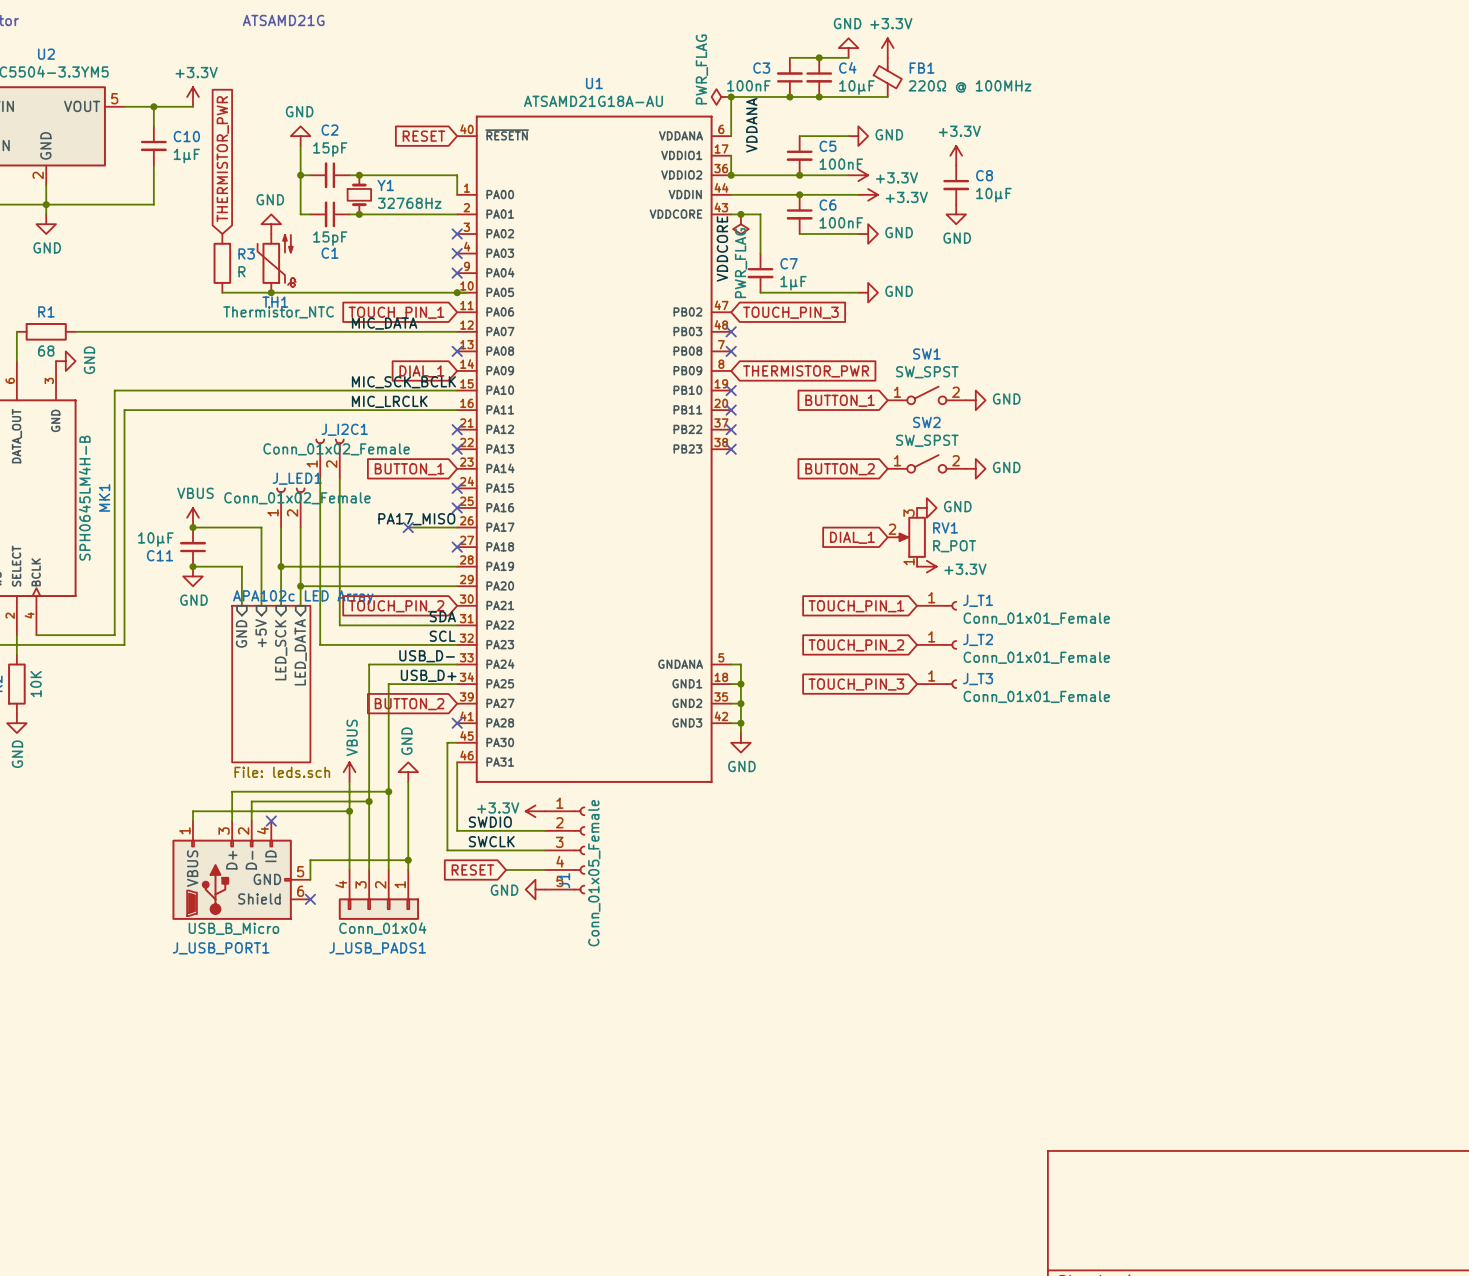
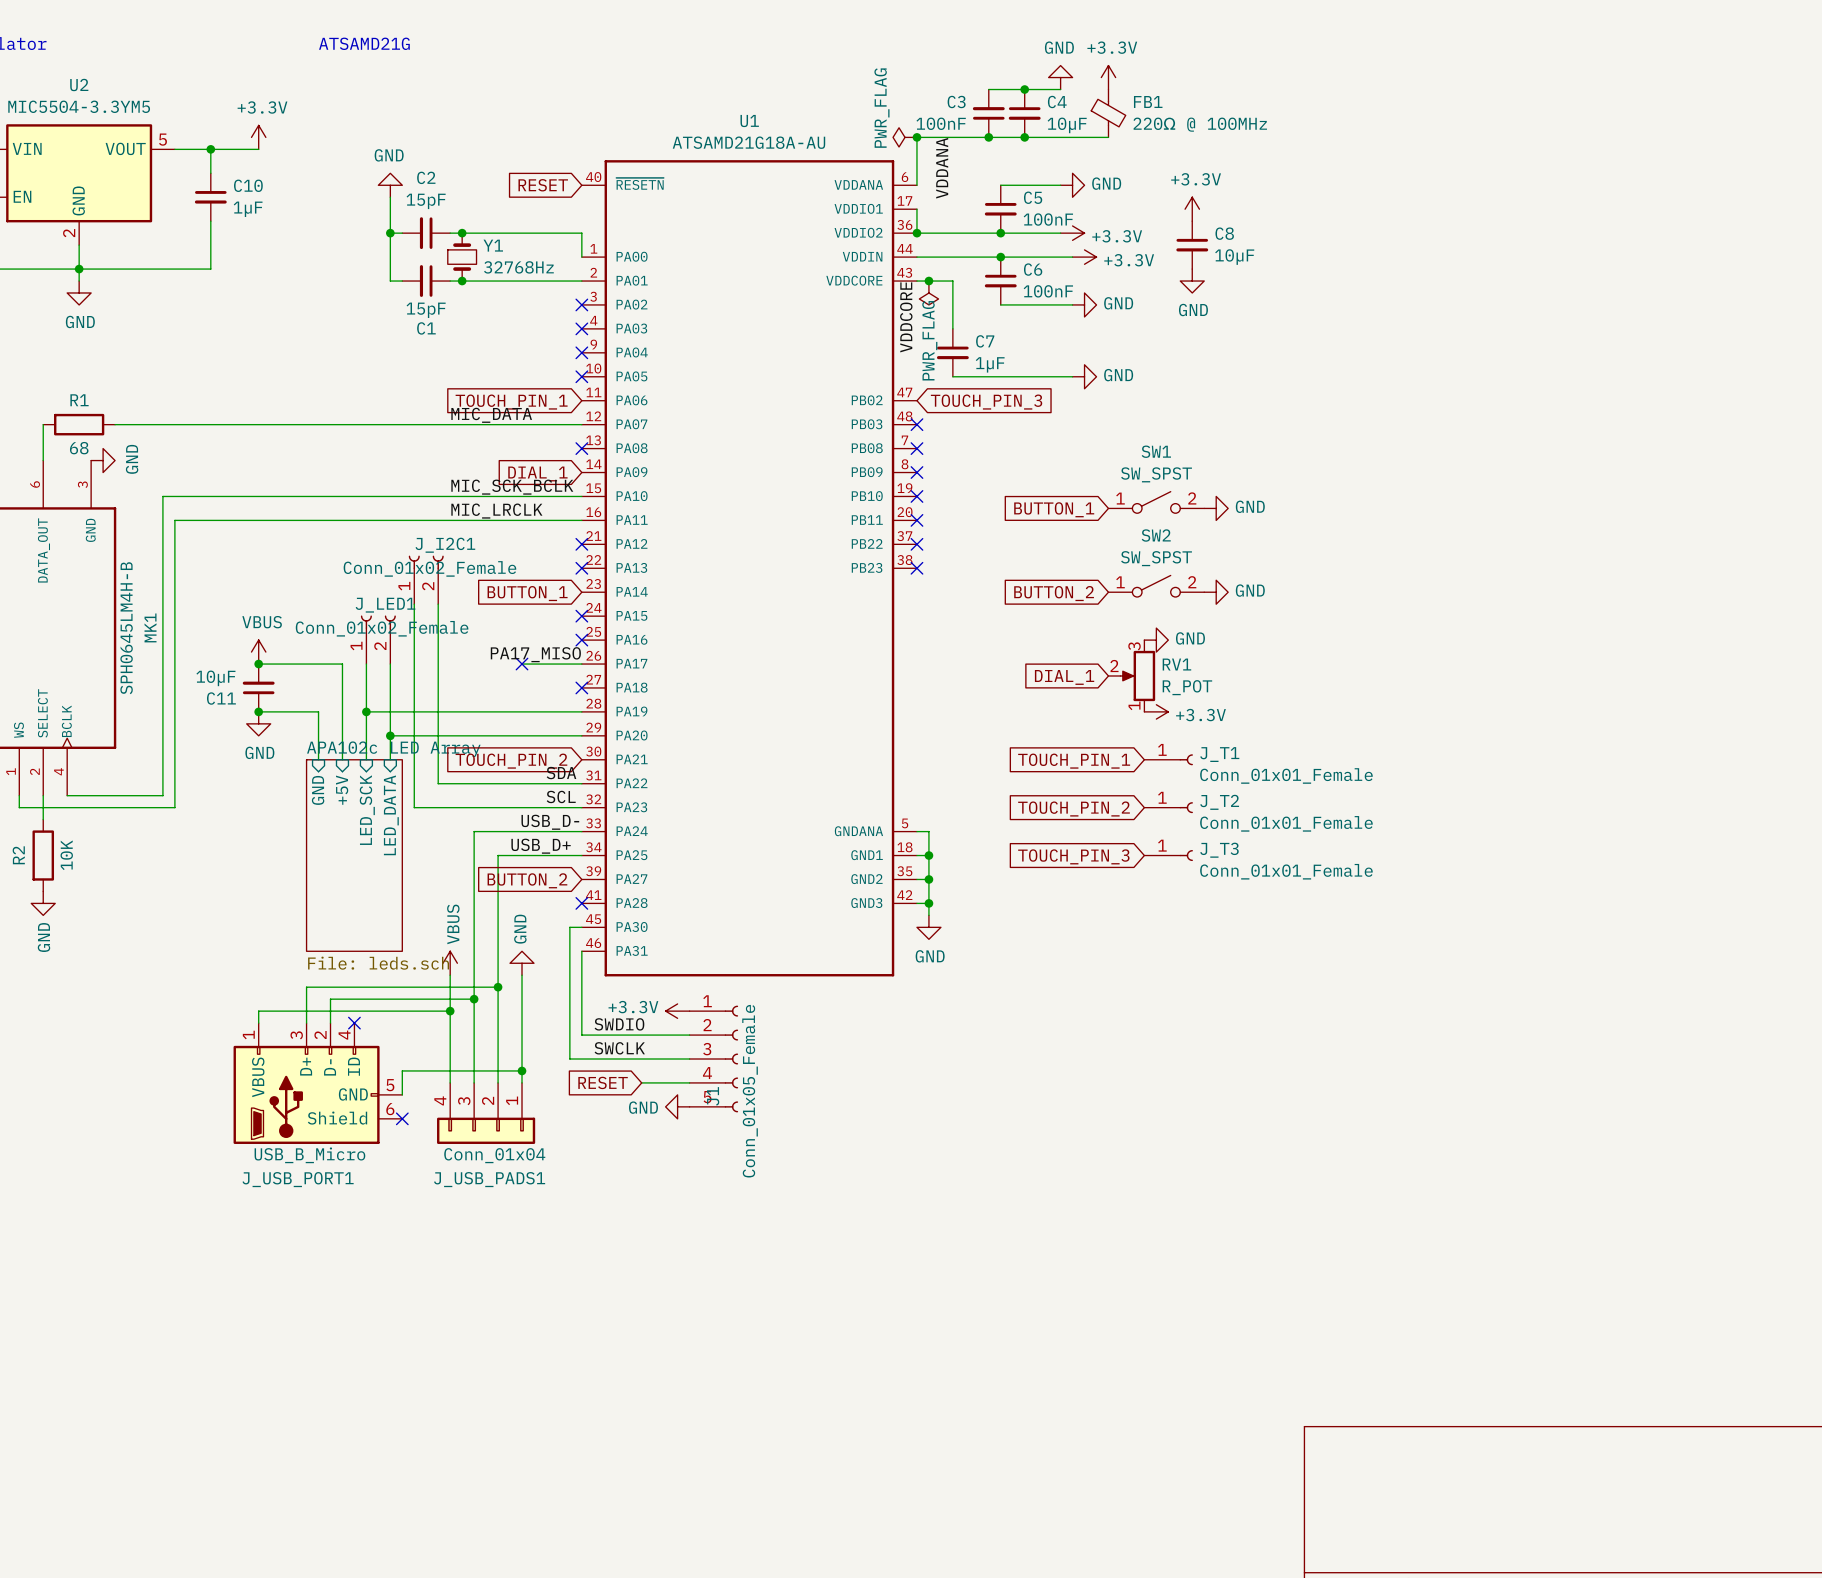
global label: THERMISTOR_PWR (222, 159) -> none
power symbol: GND (271, 224) -> none
R3: R (222, 263) -> none
TH1: Thermistor_NTC (276, 263) -> none
wire: (222, 292) (466, 292) -> none
junction: (271, 292) -> none
junction: (457, 292) -> none
no-connect mark: none -> (581, 376)
no-connect mark: none -> (916, 472)
global label: THERMISTOR_PWR (806, 371) -> none

